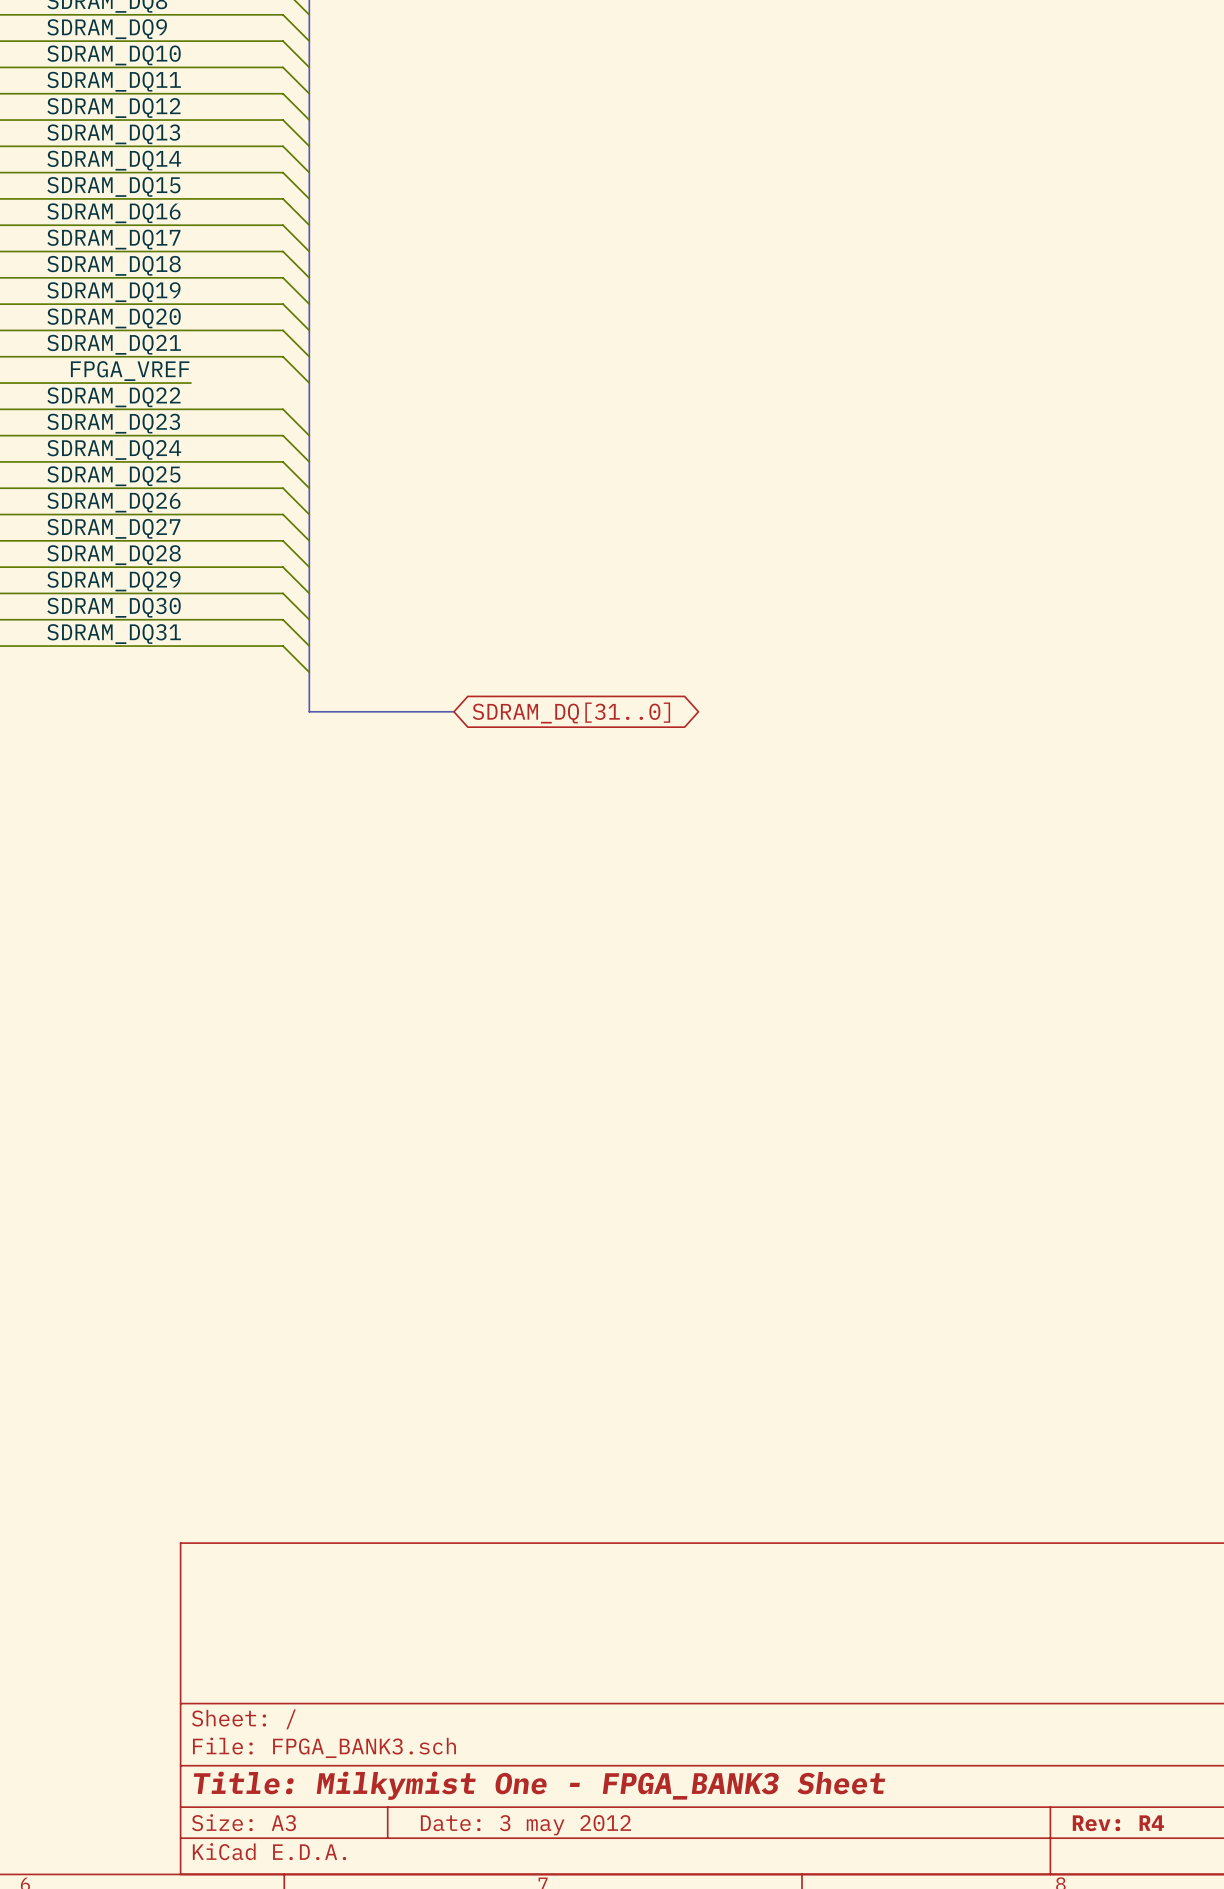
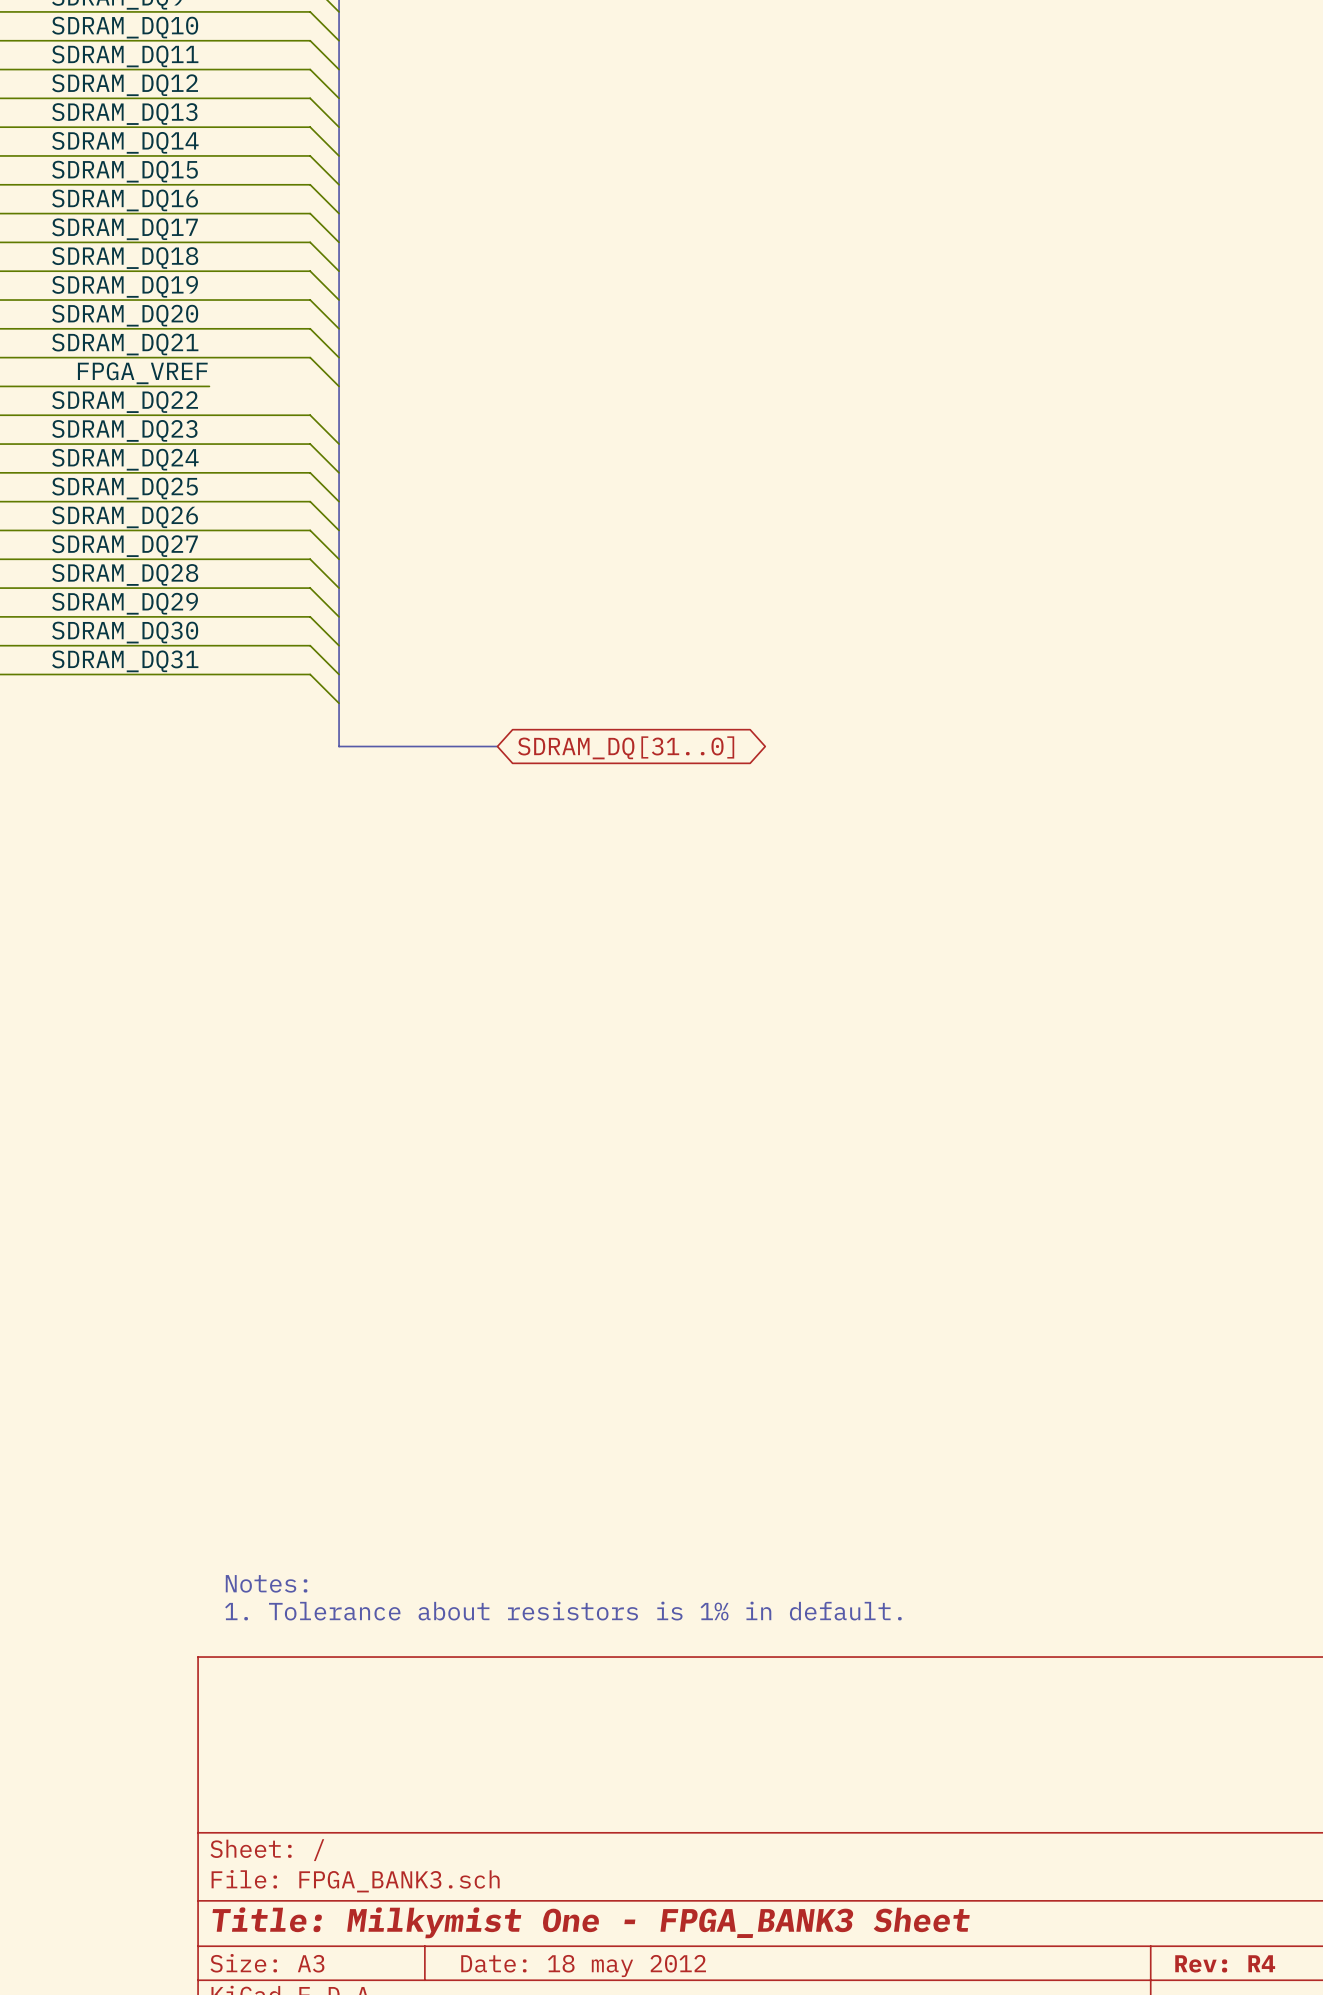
text: none -> Notes: (266, 1583)
text: none -> 1. Tolerance about resistors is 1% in default. (563, 1611)
title block: Date: 3 may 2012 (525, 1825) -> Date: 18 may 2012 (583, 1966)

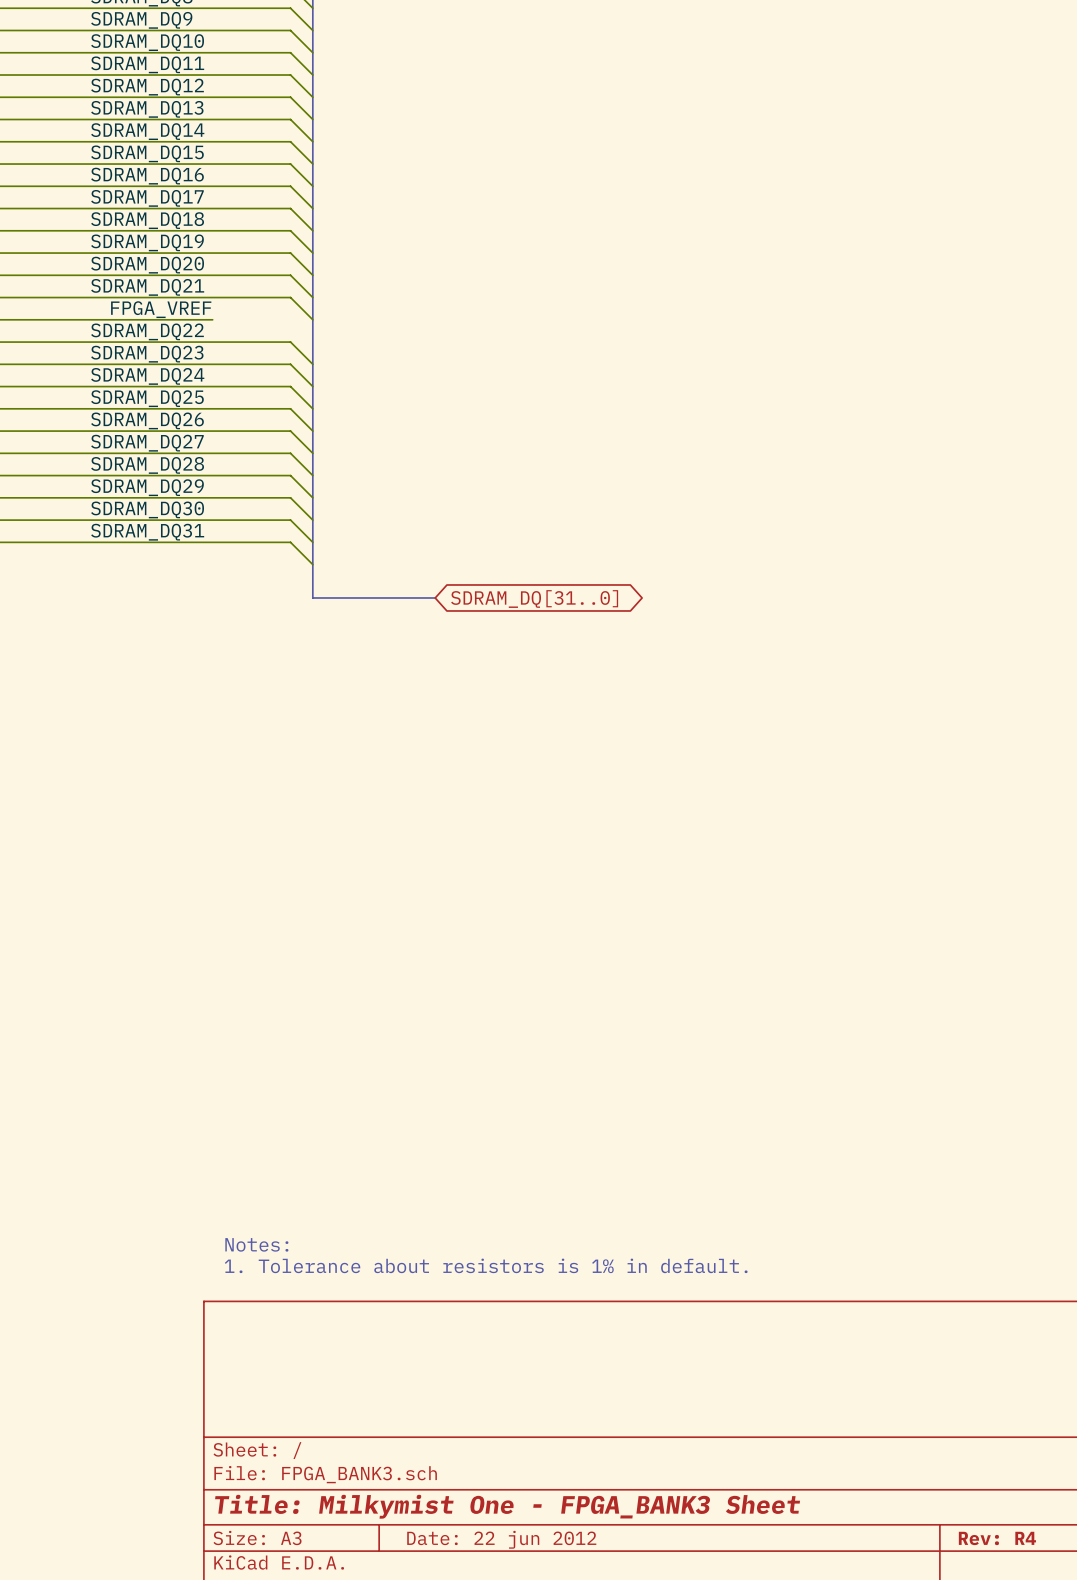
title block: Date: 18 may 2012 (583, 1966) -> Date: 22 jun 2012 (501, 1539)

